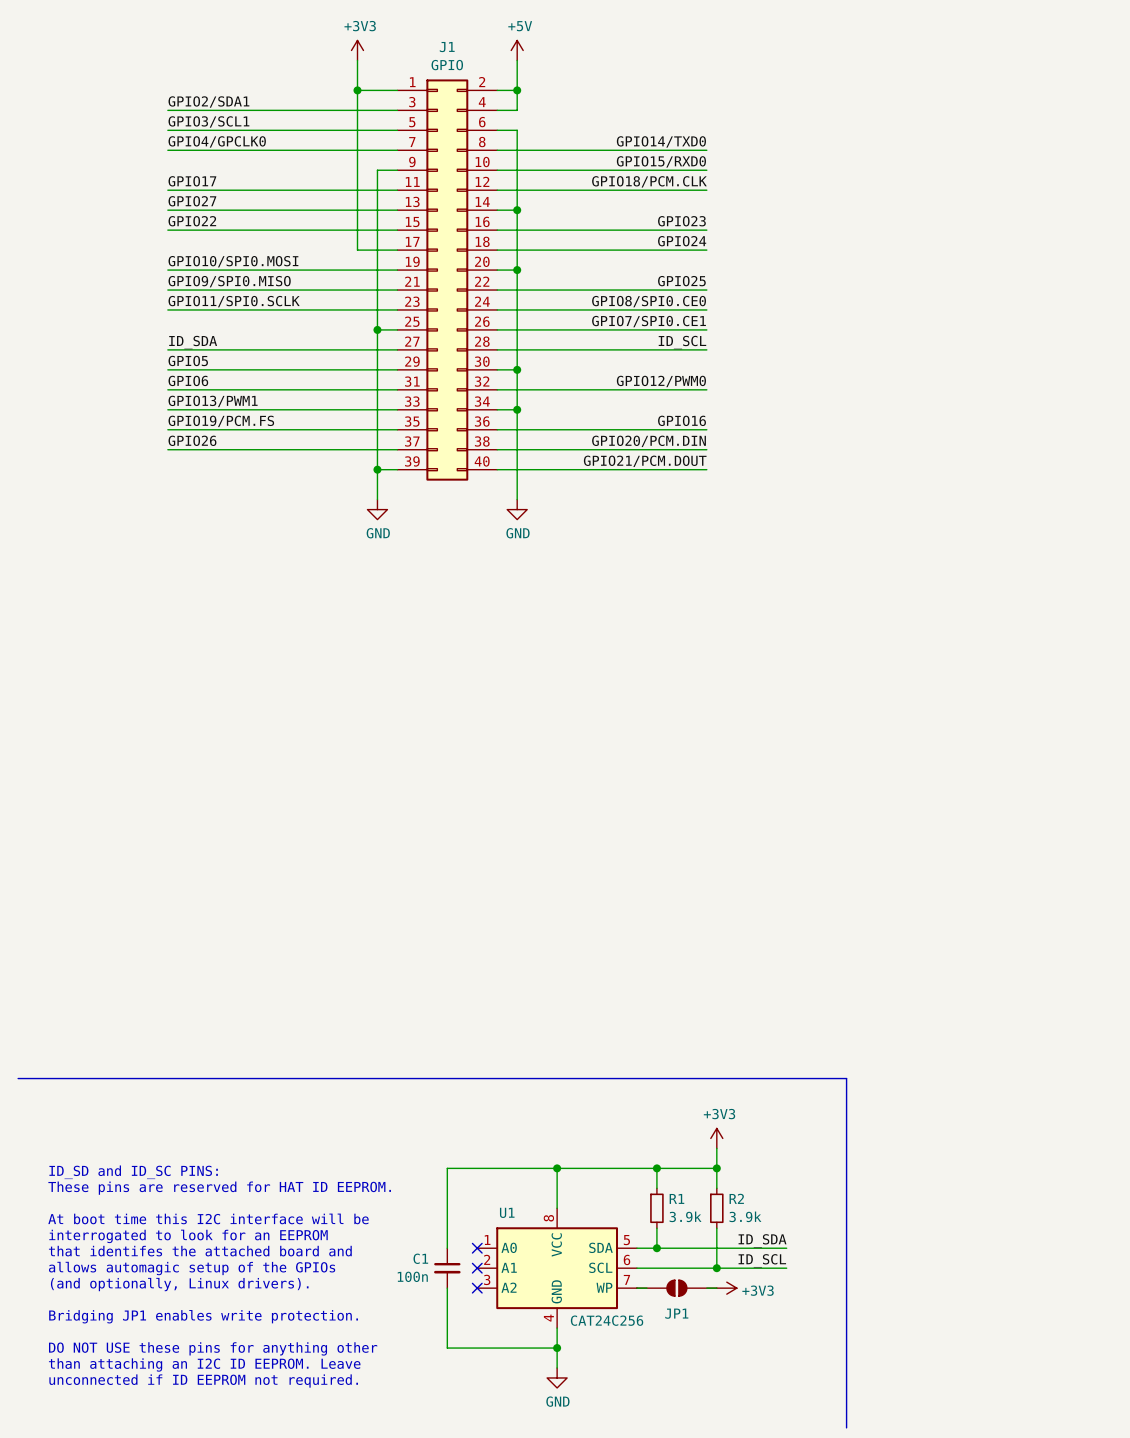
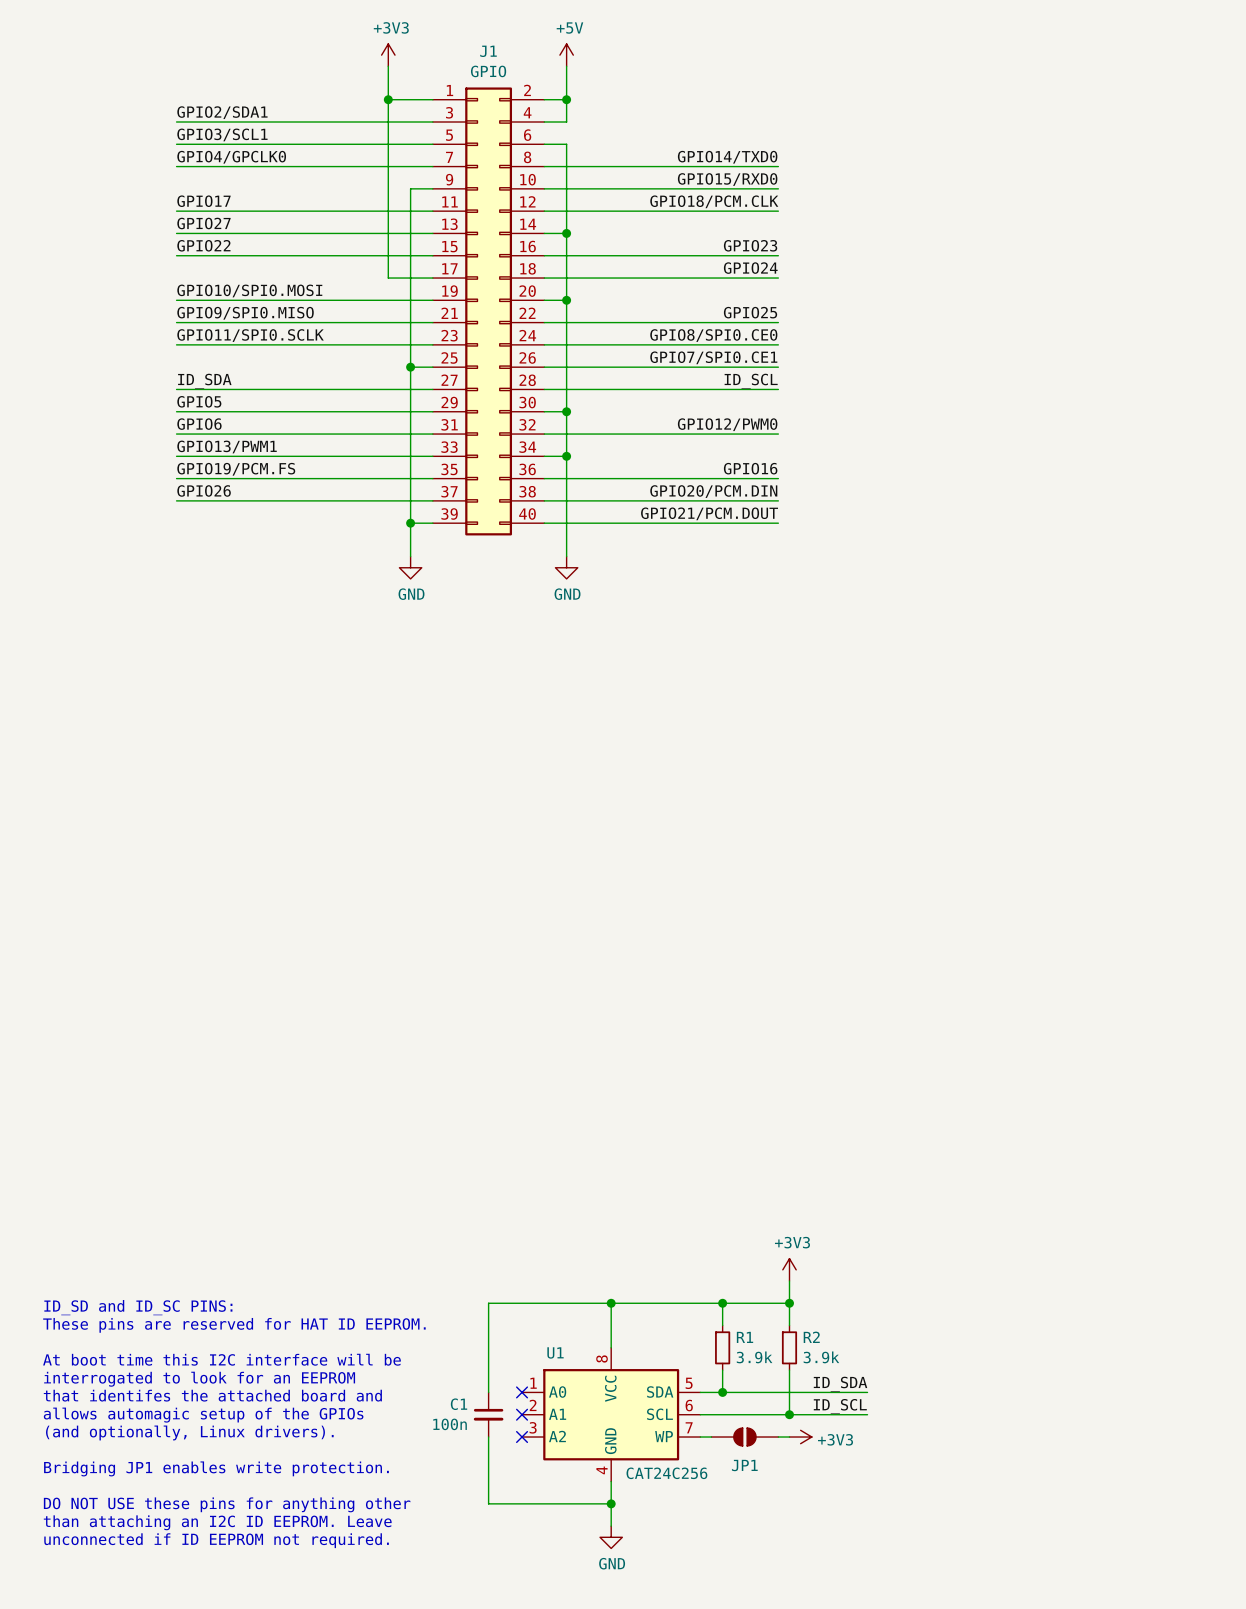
line: (18, 1078) (846, 1078) (846, 1427) -> none
JP1 symbol: [636, 1279, 717, 1297] -> [711, 1428, 779, 1446]

